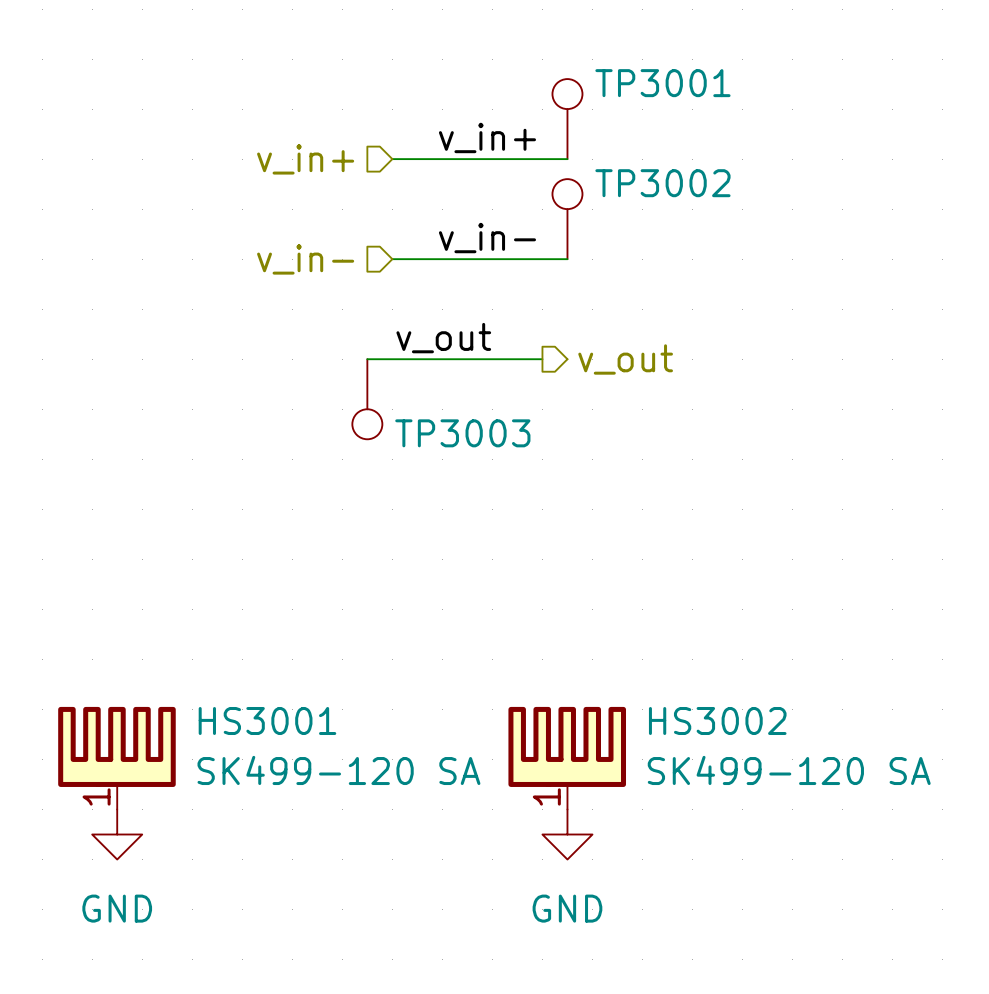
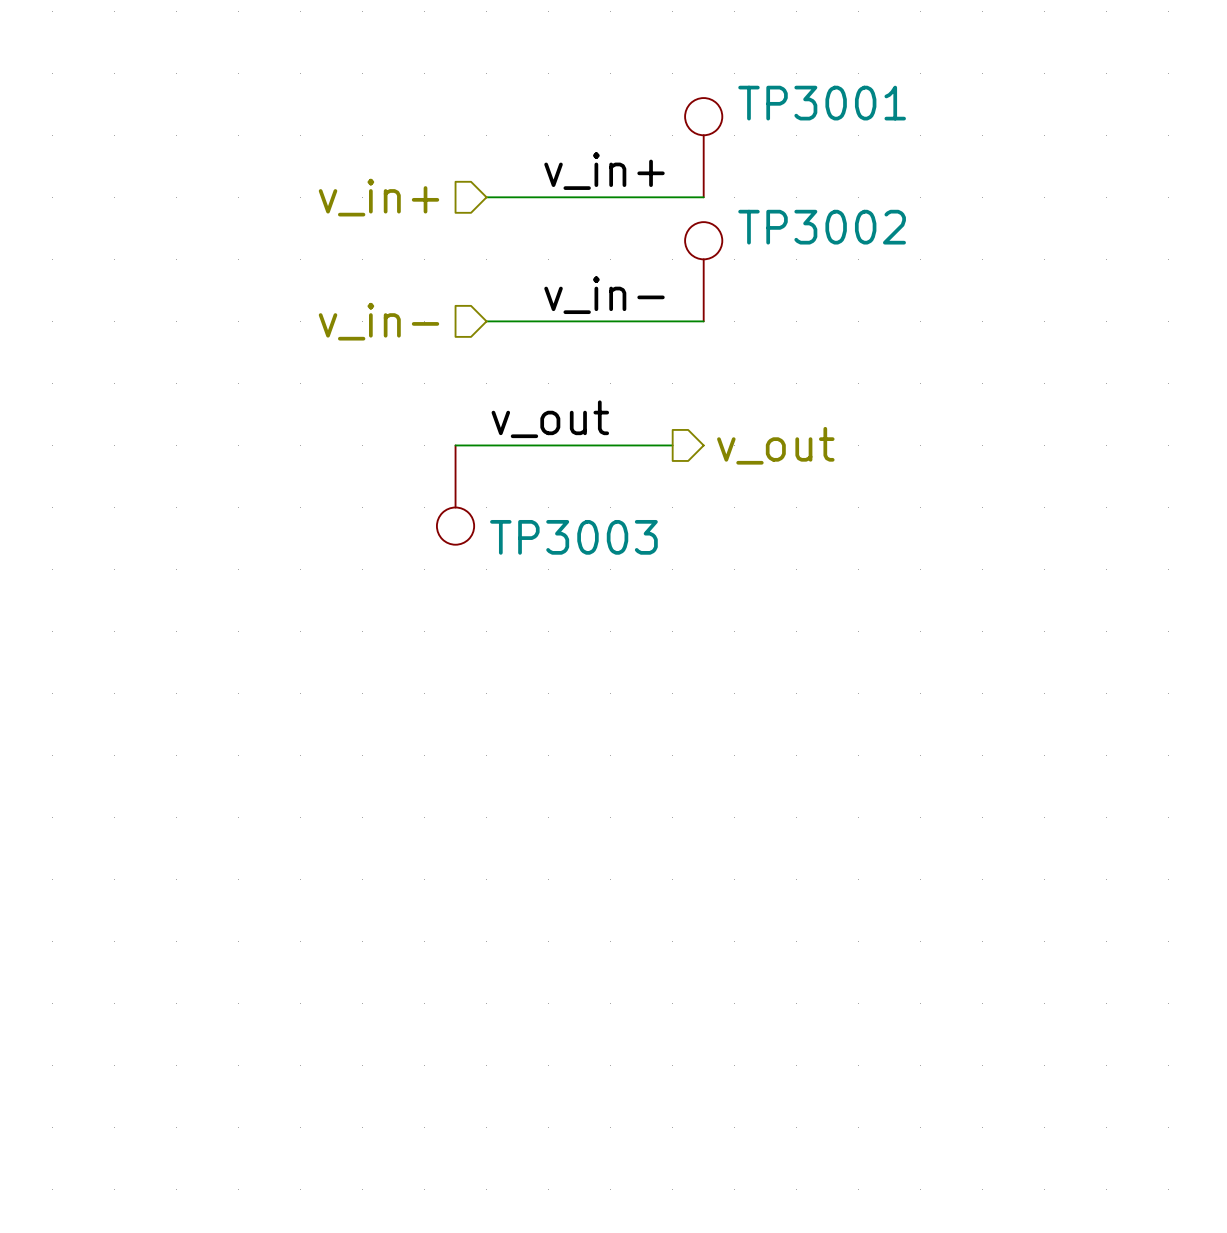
HS3001: SK499-120 SA (116, 758) -> none
HS3002: SK499-120 SA (567, 758) -> none
power symbol: GND (117, 834) -> none
power symbol: GND (567, 834) -> none

